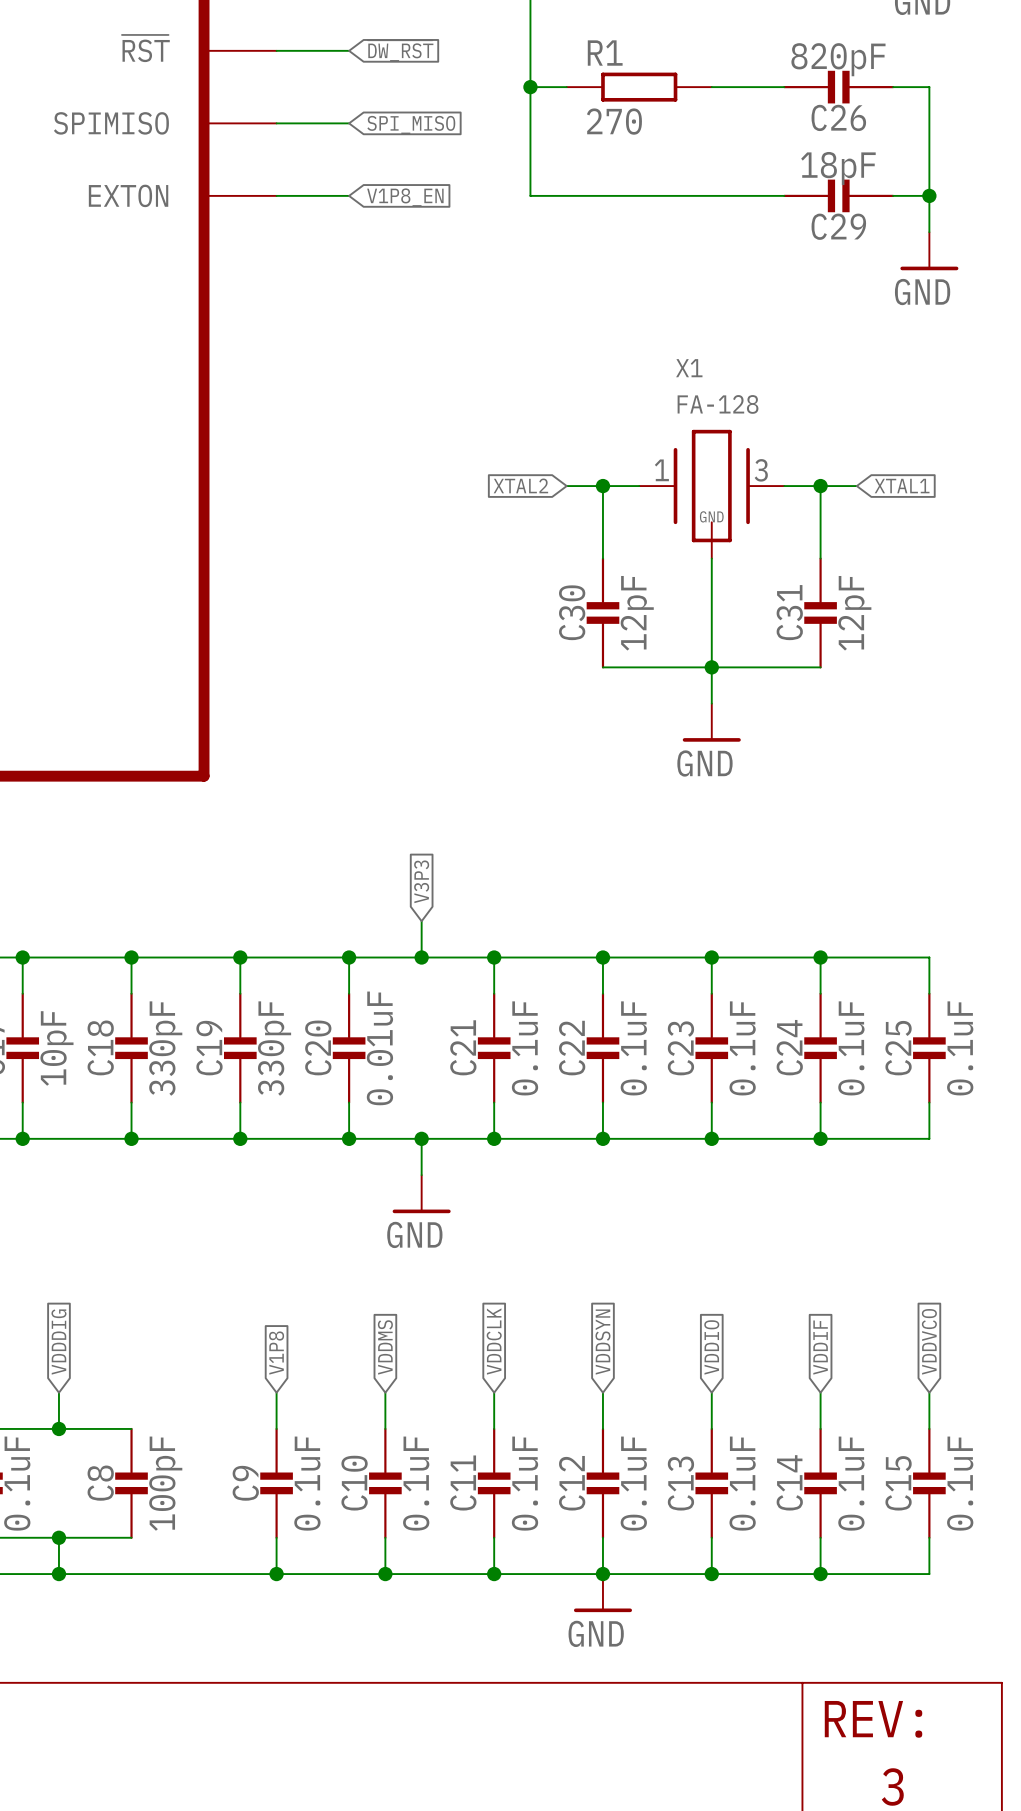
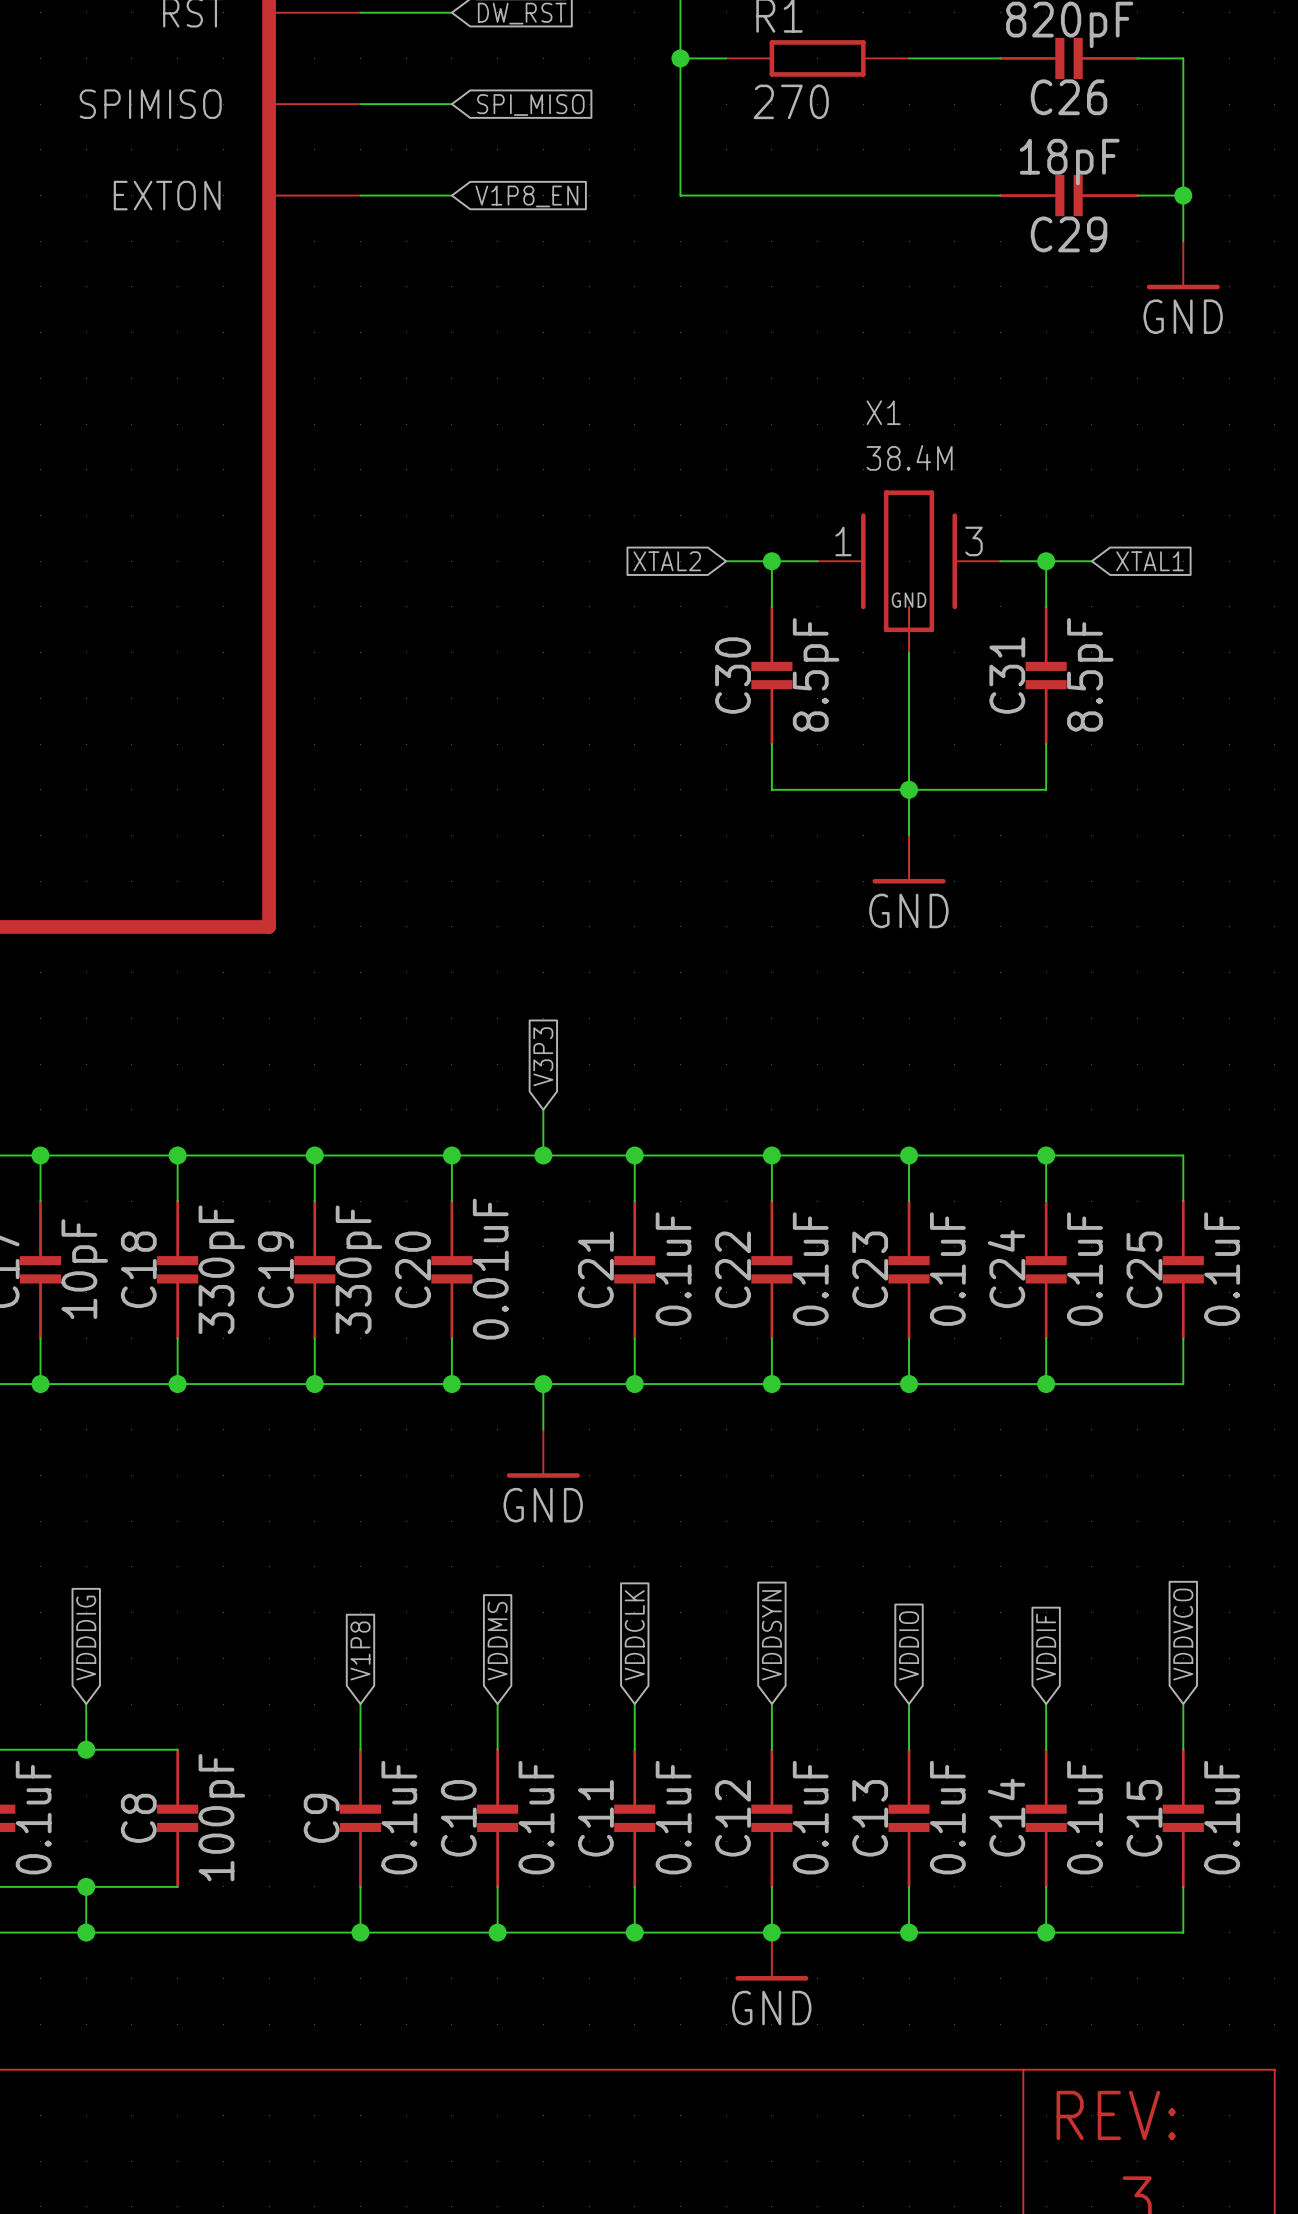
X1 value: FA-128 (718, 404) -> 38.4M (909, 457)
C30 position: (602, 612) -> (771, 675)
C31 position: (820, 612) -> (1046, 675)
C30 value: 12pF (637, 613) -> 8.5pF (816, 674)
C31 value: 12pF (854, 613) -> 8.5pF (1090, 674)

